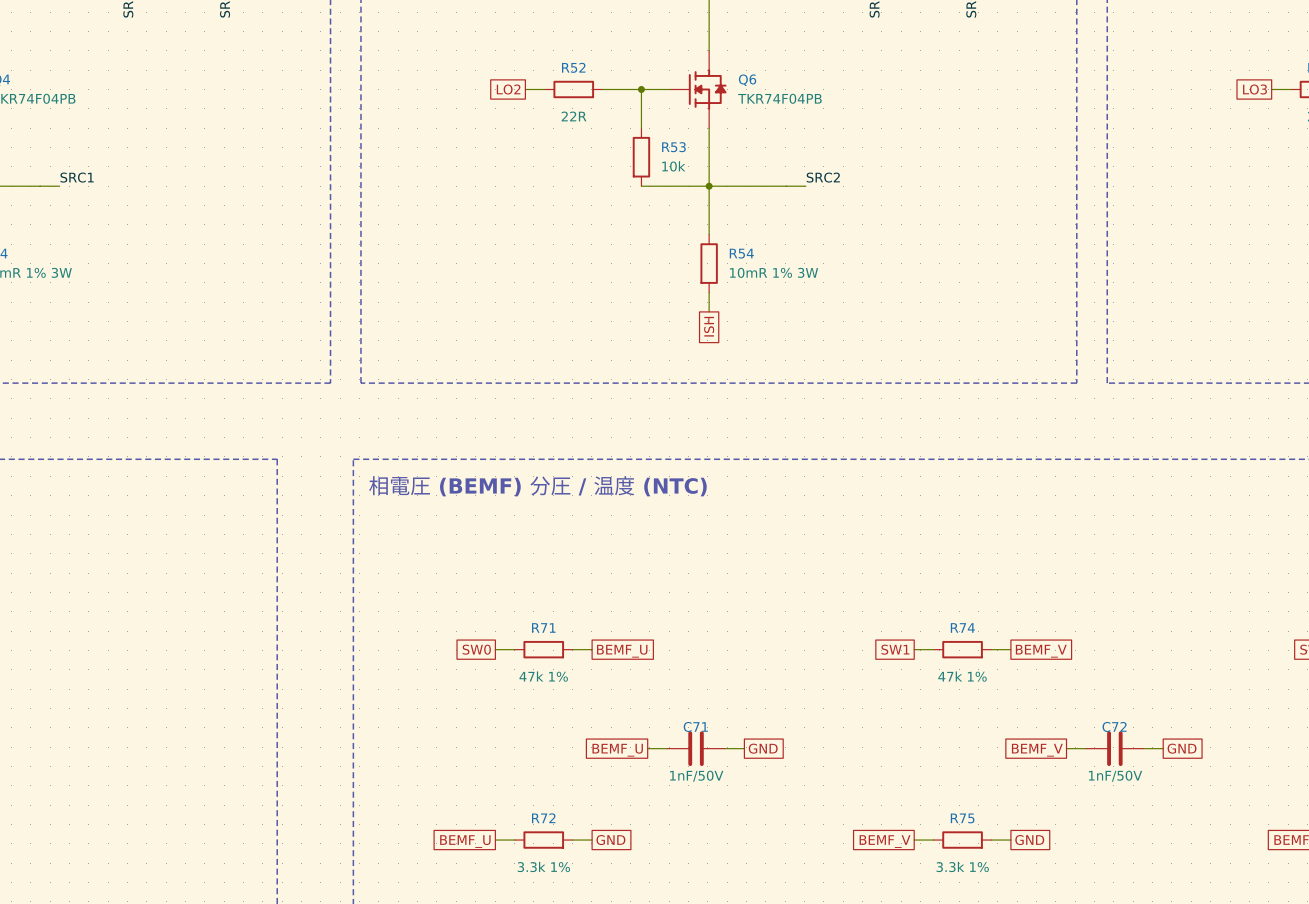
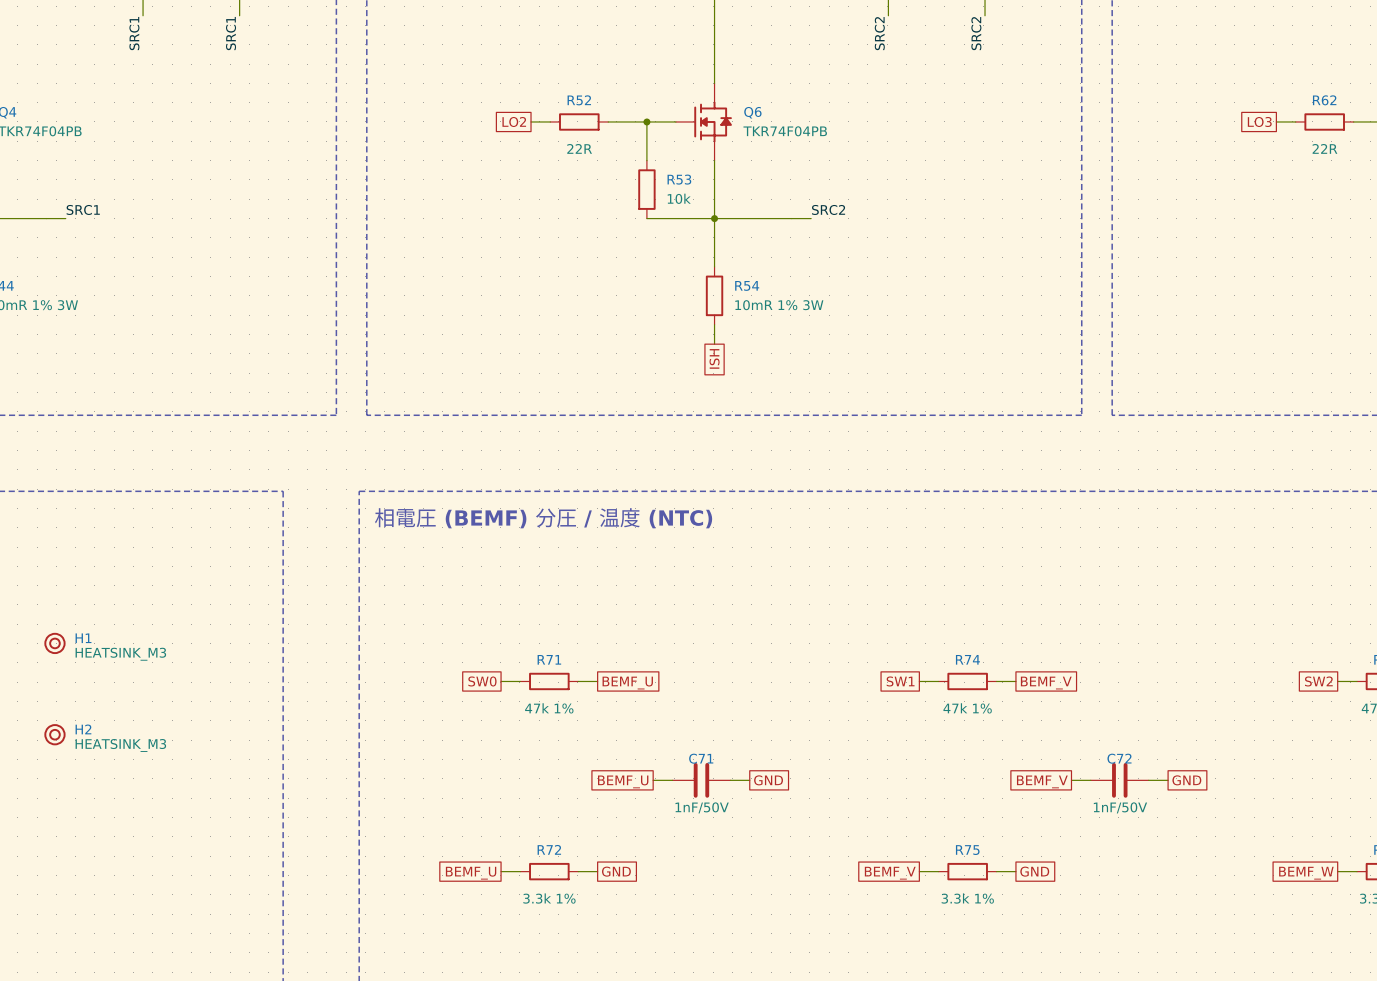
H1: none -> HEATSINK_M3 (54, 643)
H2: none -> HEATSINK_M3 (54, 734)

